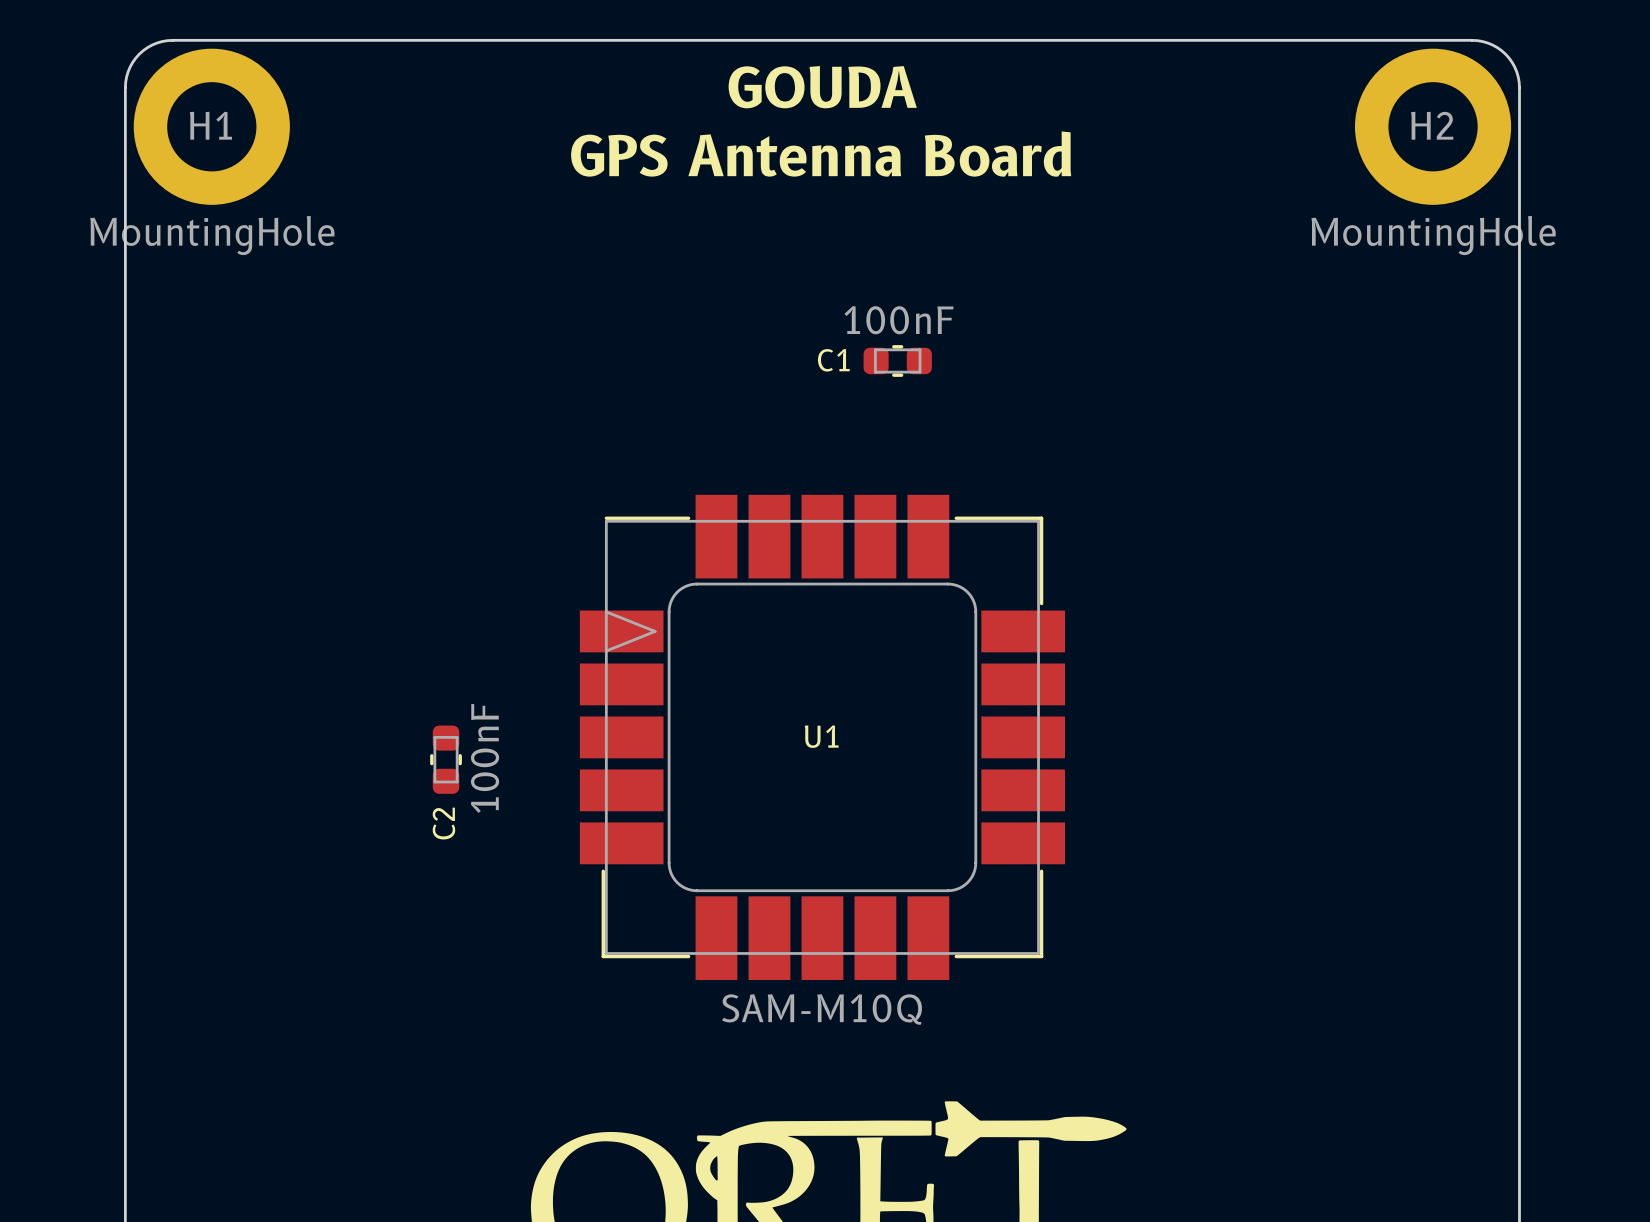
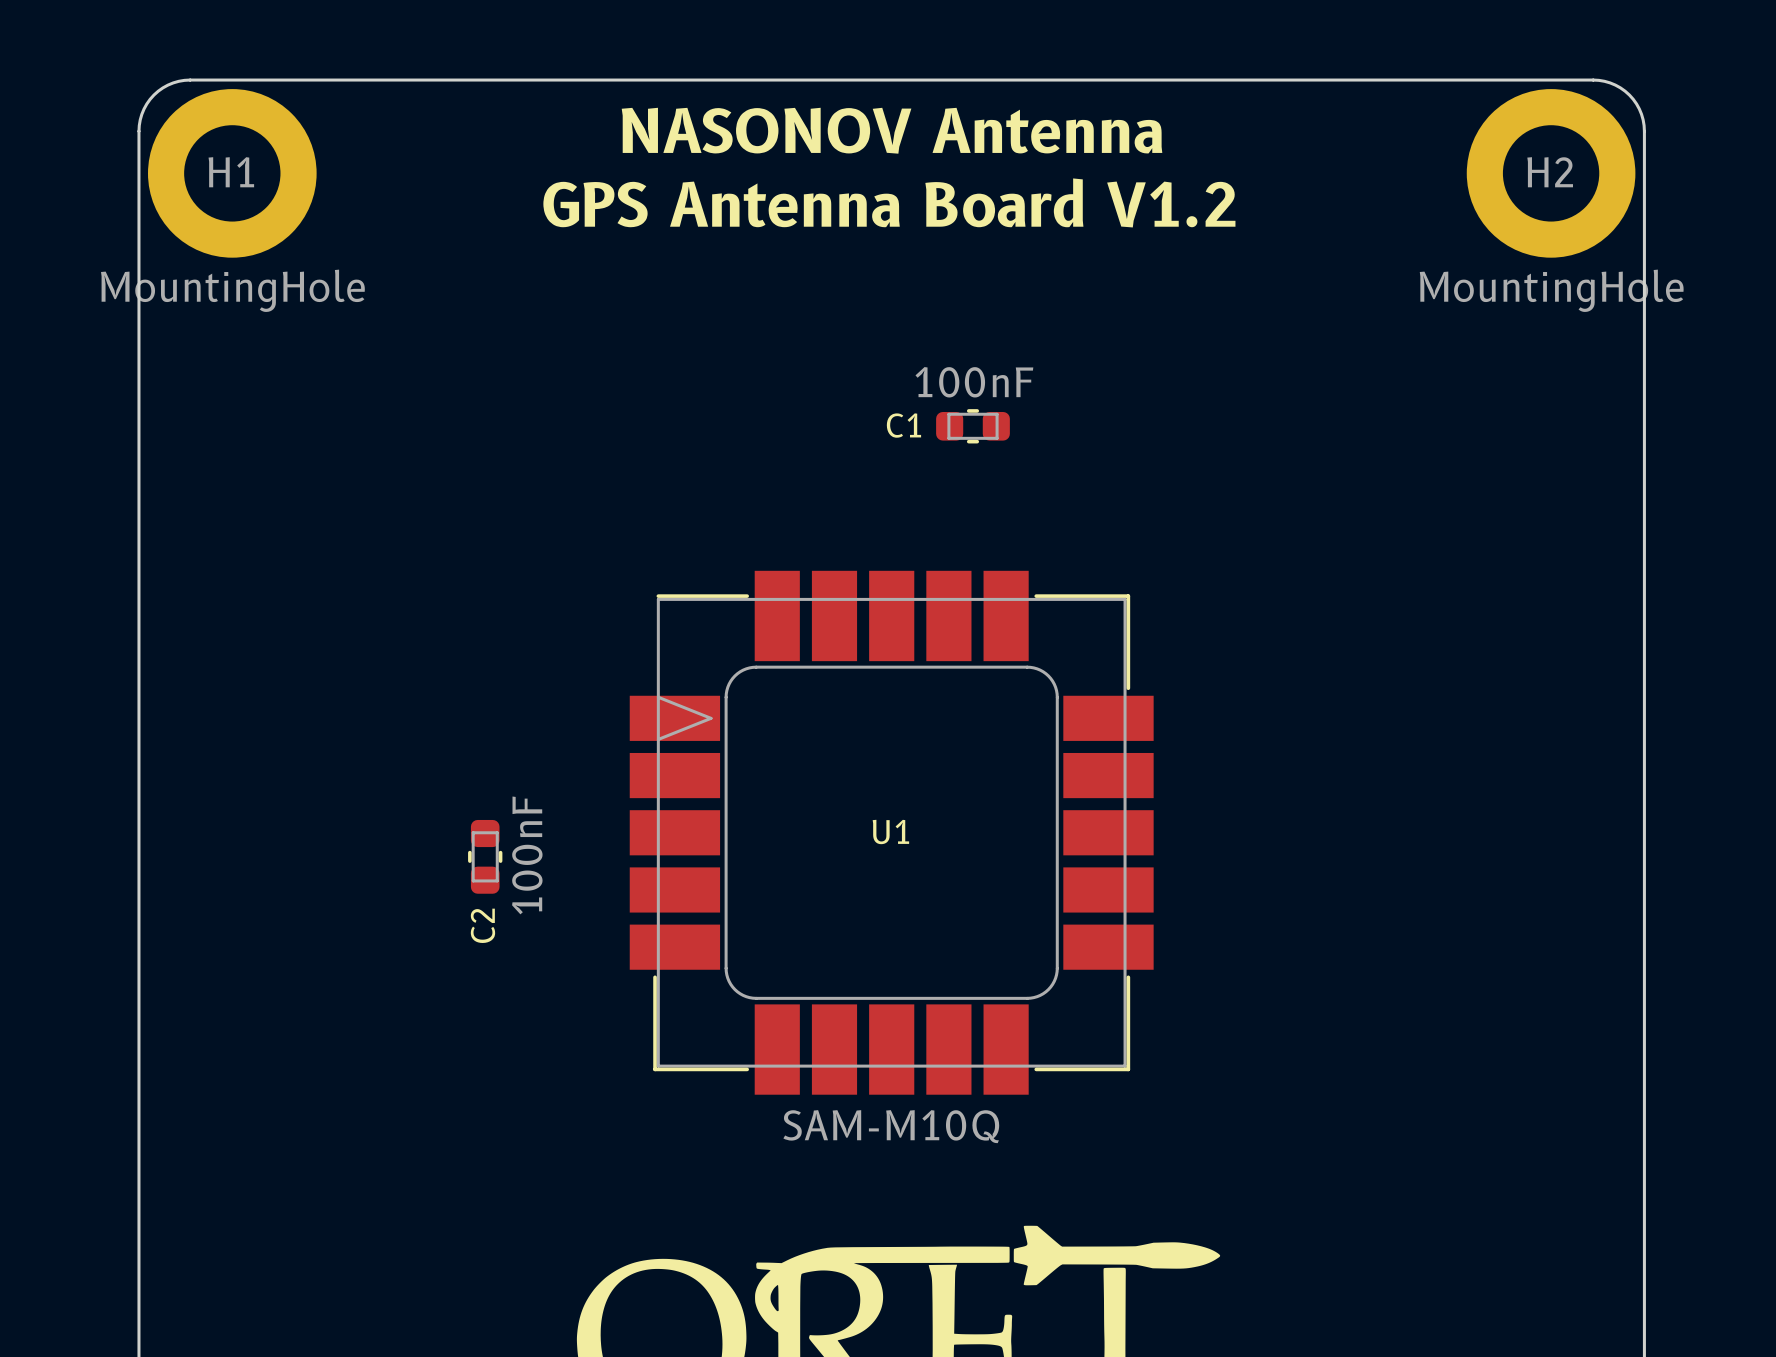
text: GOUDA (822, 87) -> NASONOV Antenna (892, 130)
text: GPS Antenna Board (821, 154) -> GPS Antenna Board V1.2 (889, 202)

